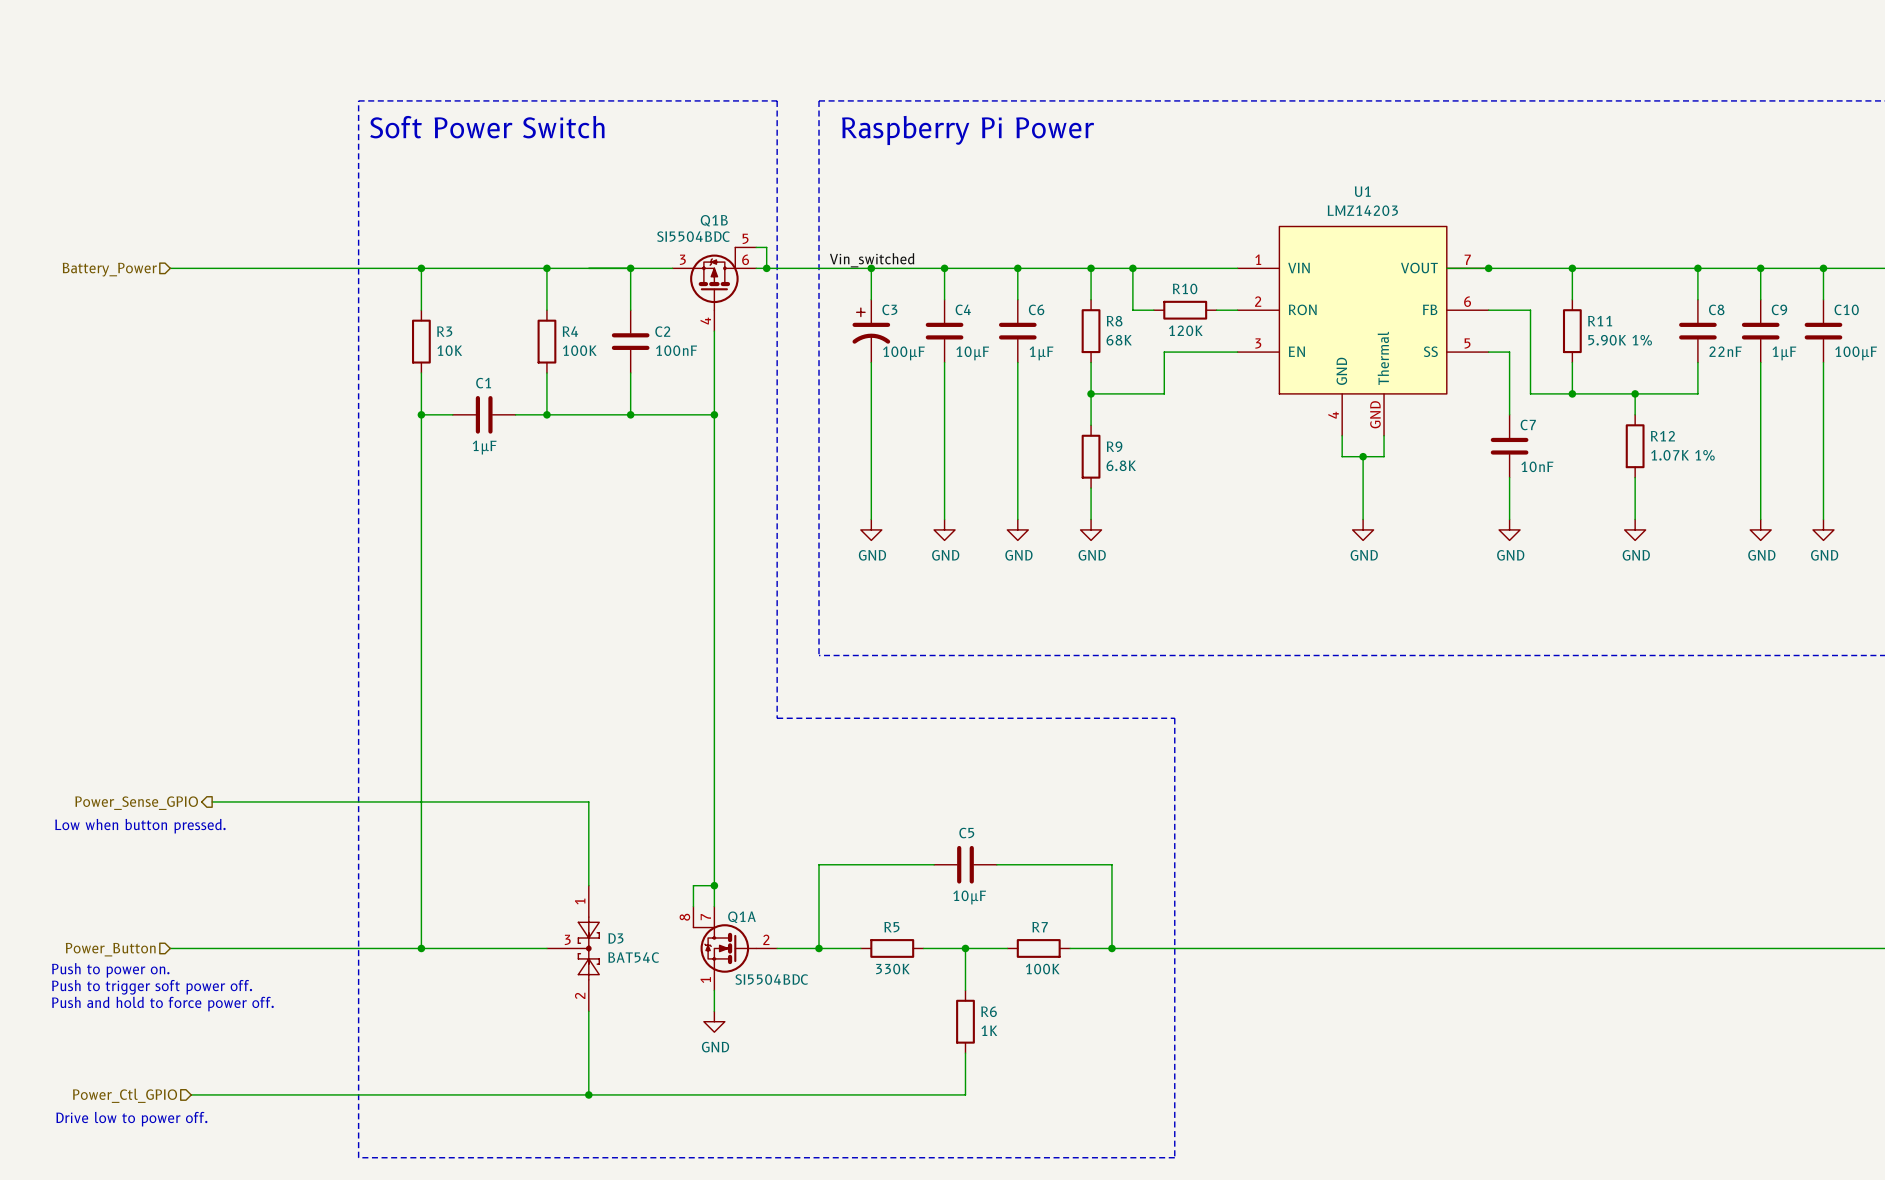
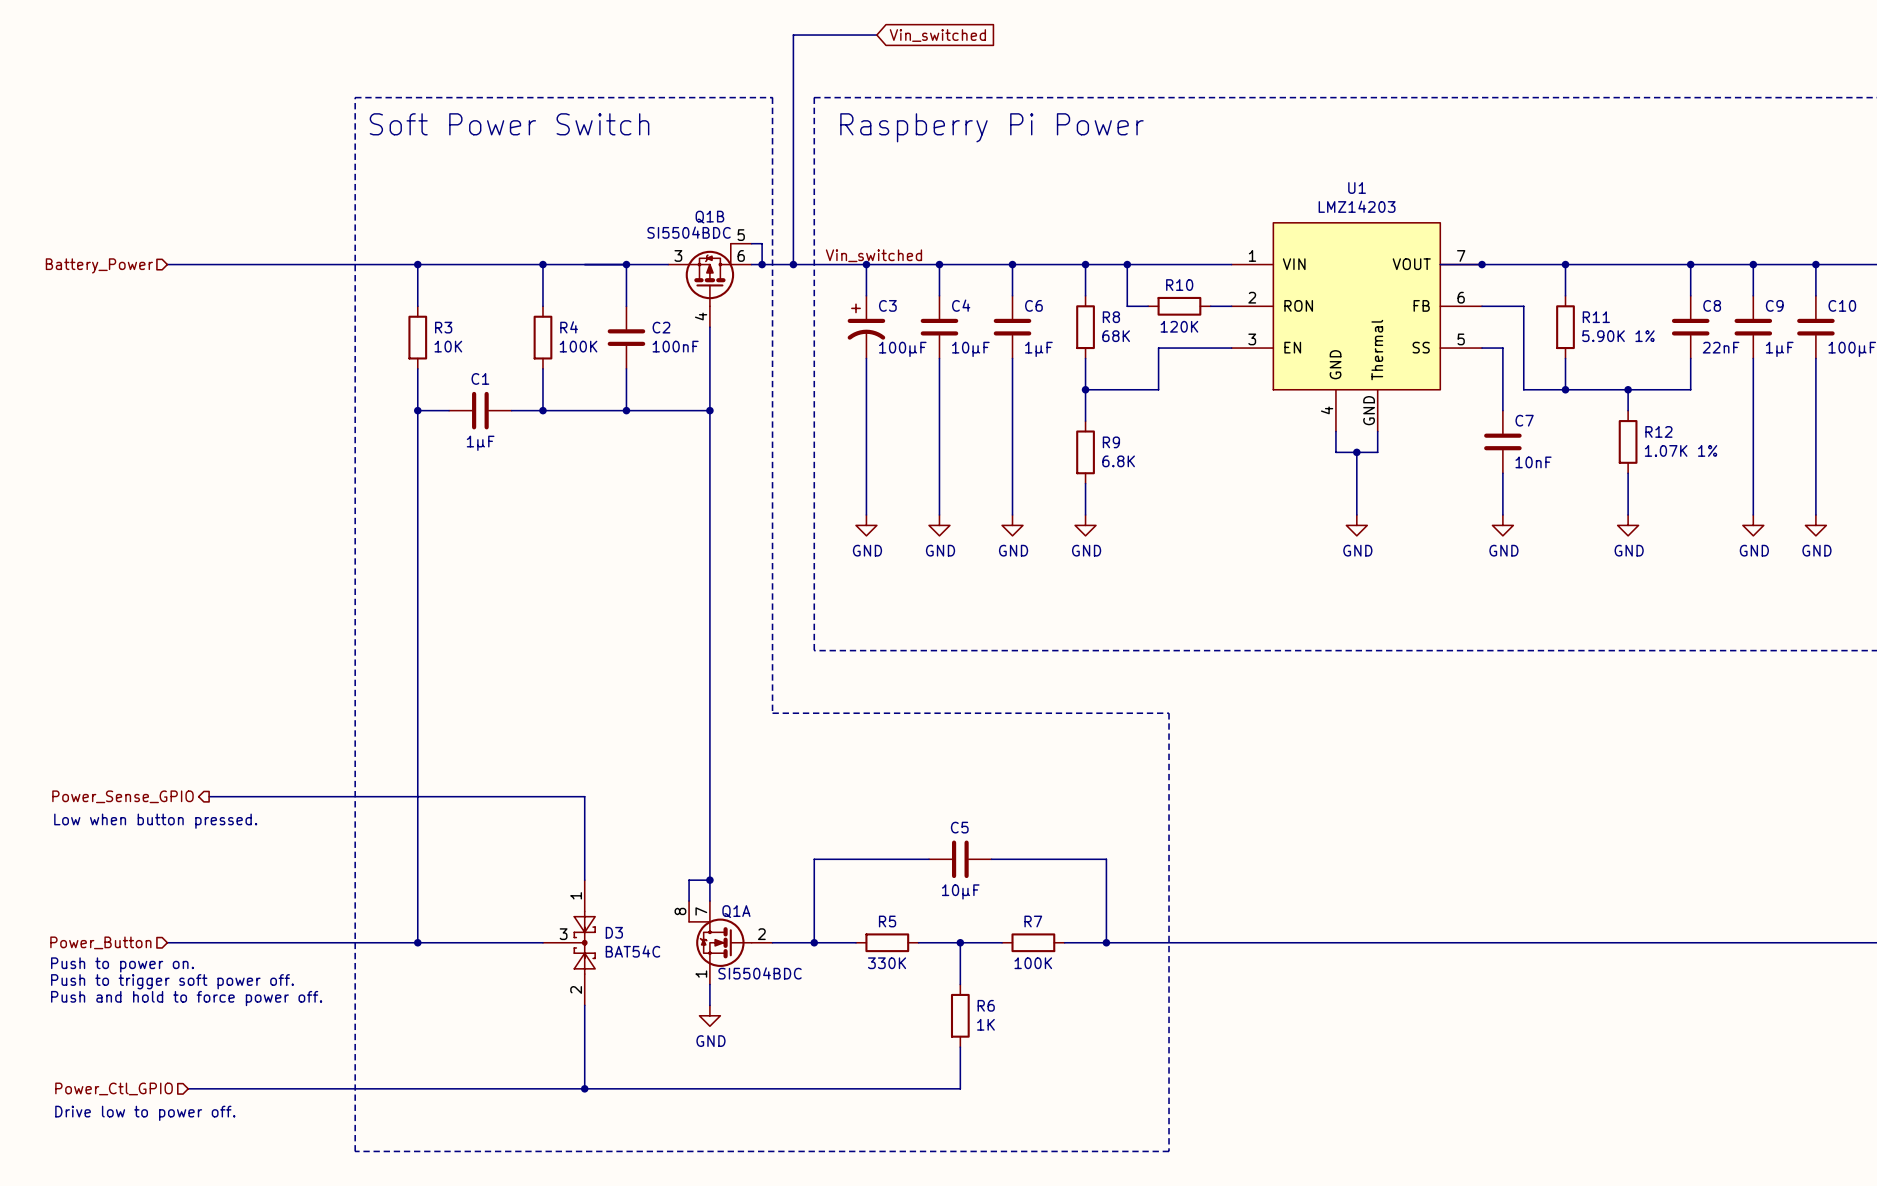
wire: none -> (876, 35) (793, 35) (793, 264)
global label: none -> Vin_switched (937, 35)
junction: none -> (793, 264)

